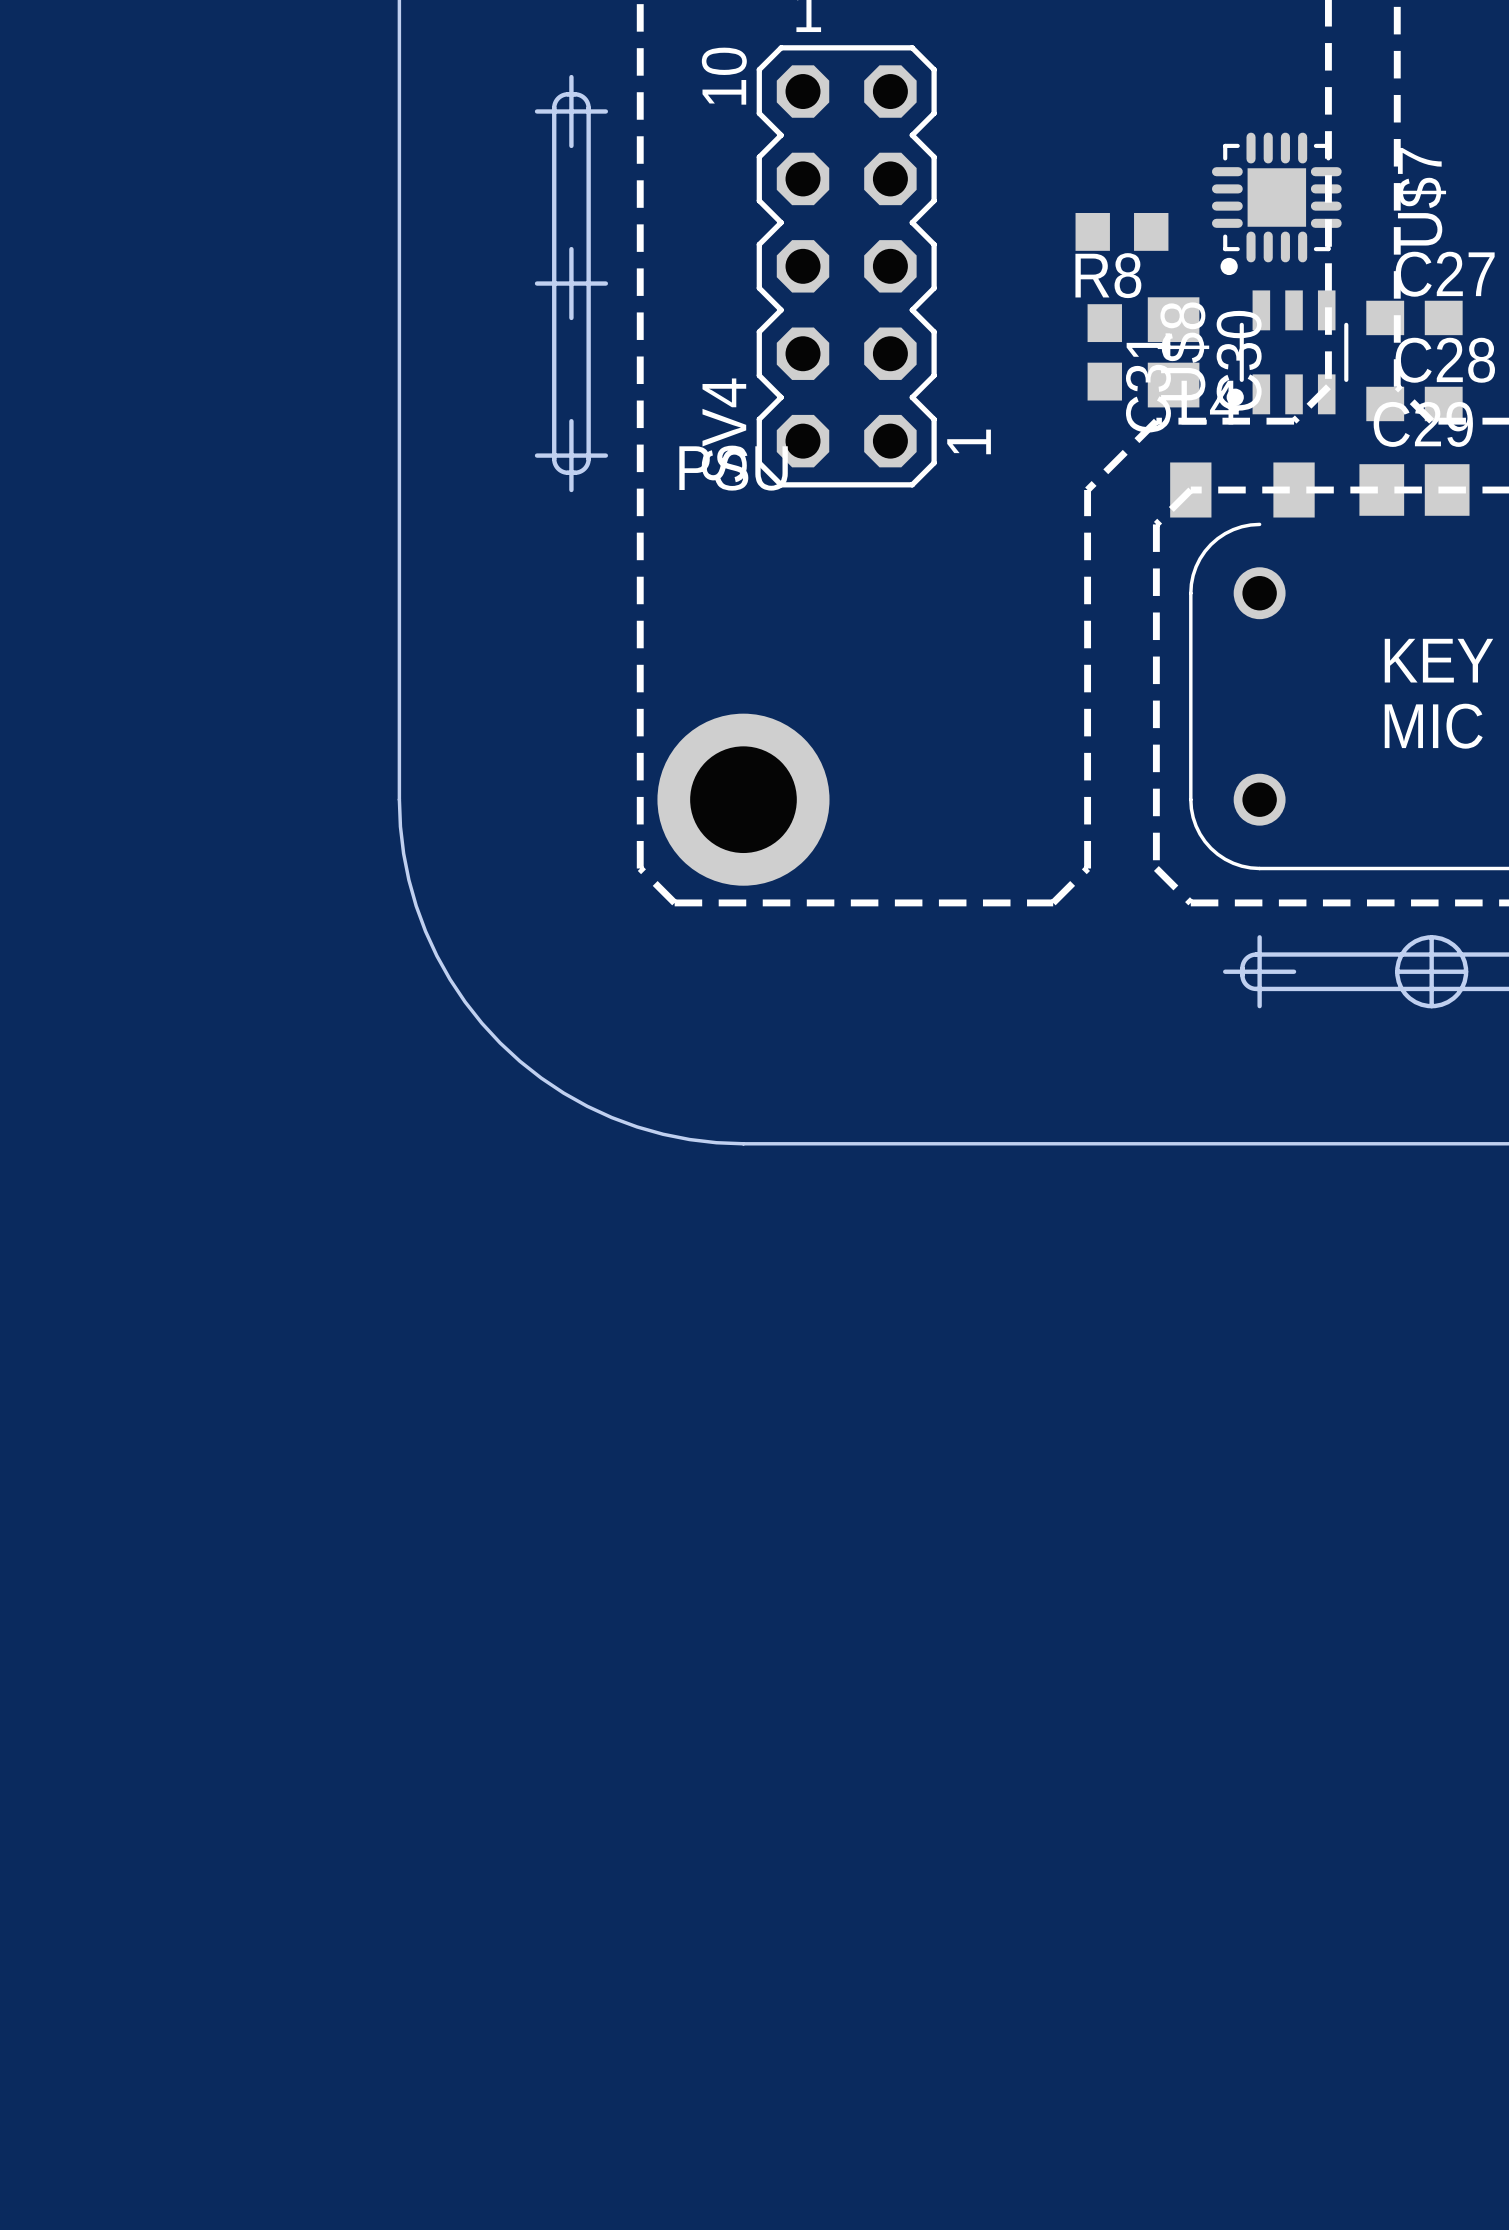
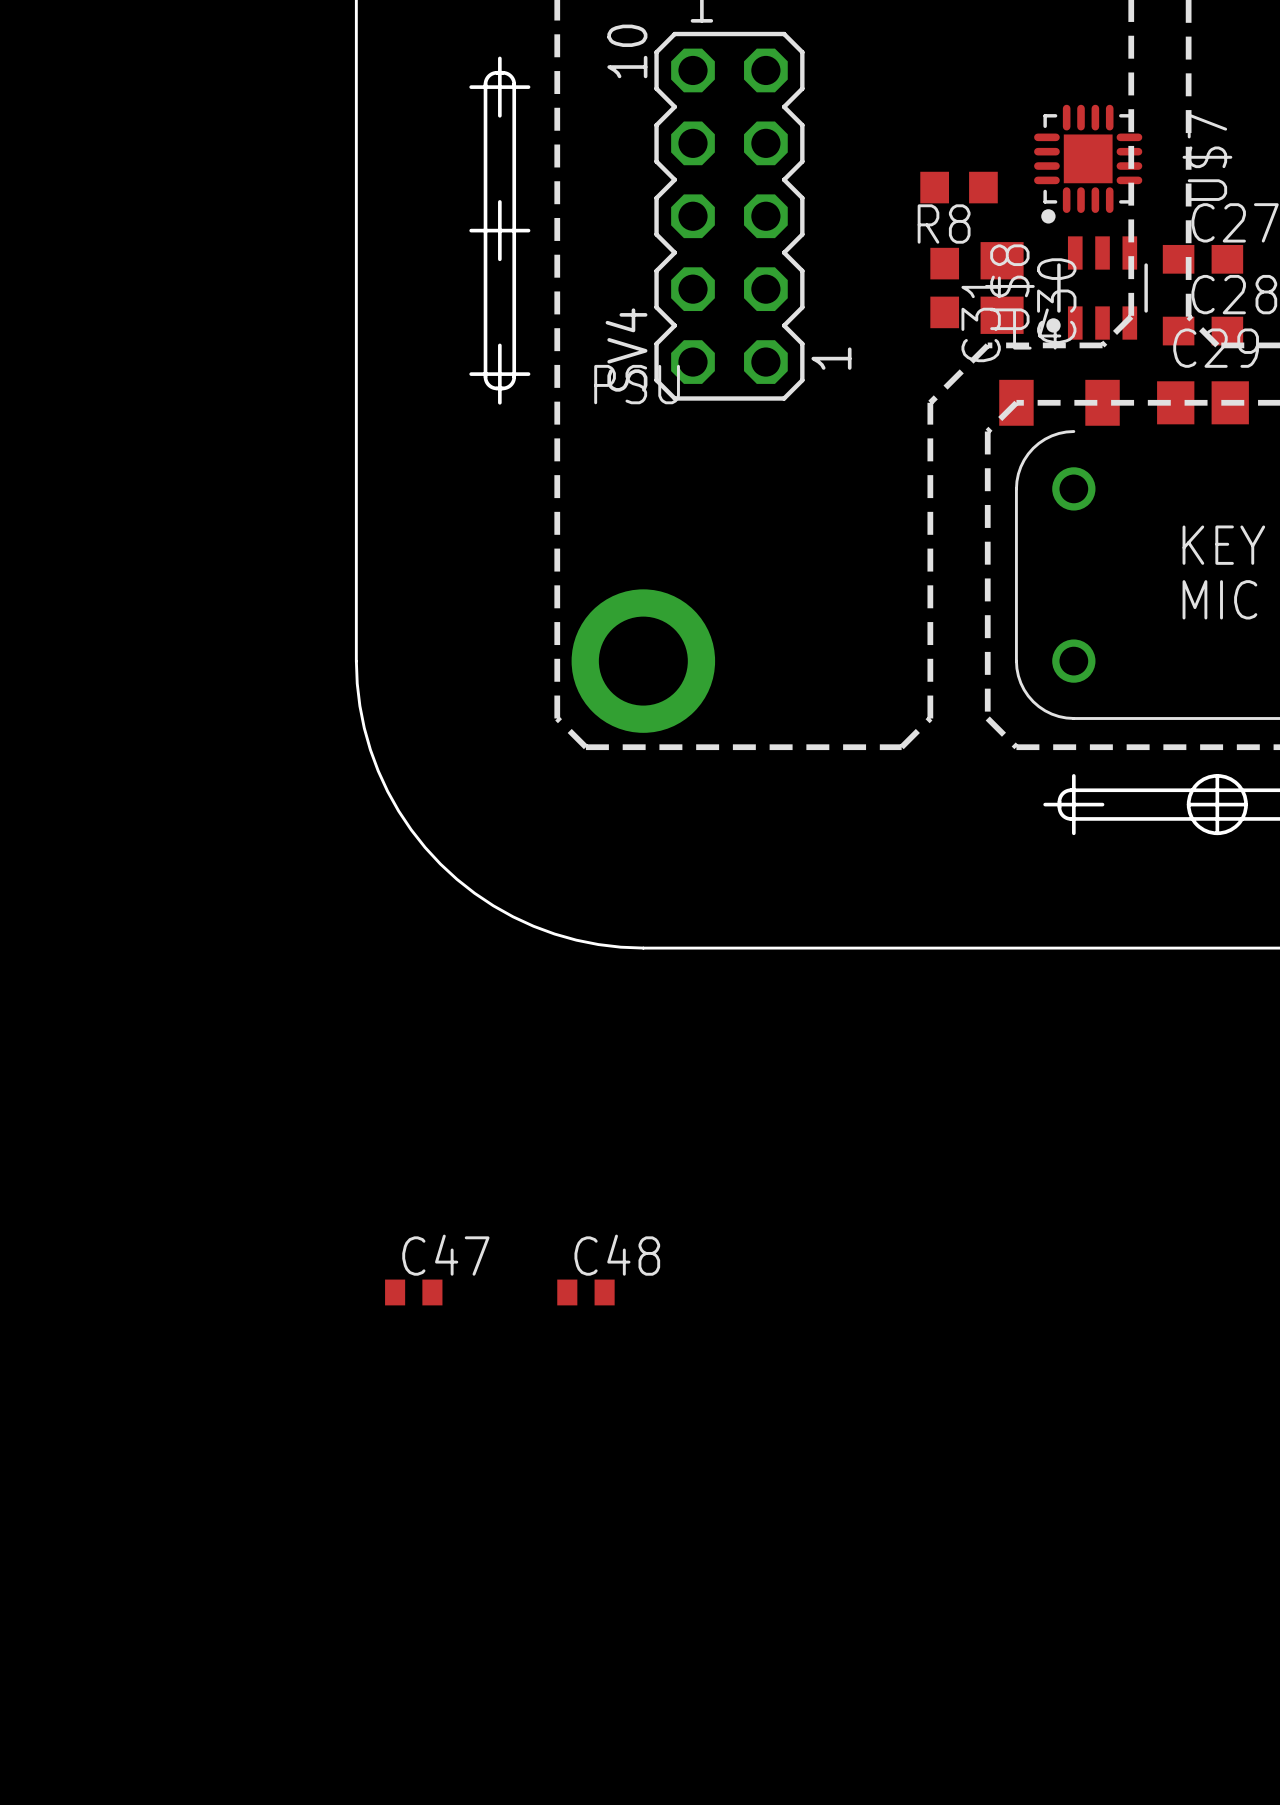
C47: none -> (413, 1292)
C48: none -> (585, 1292)

